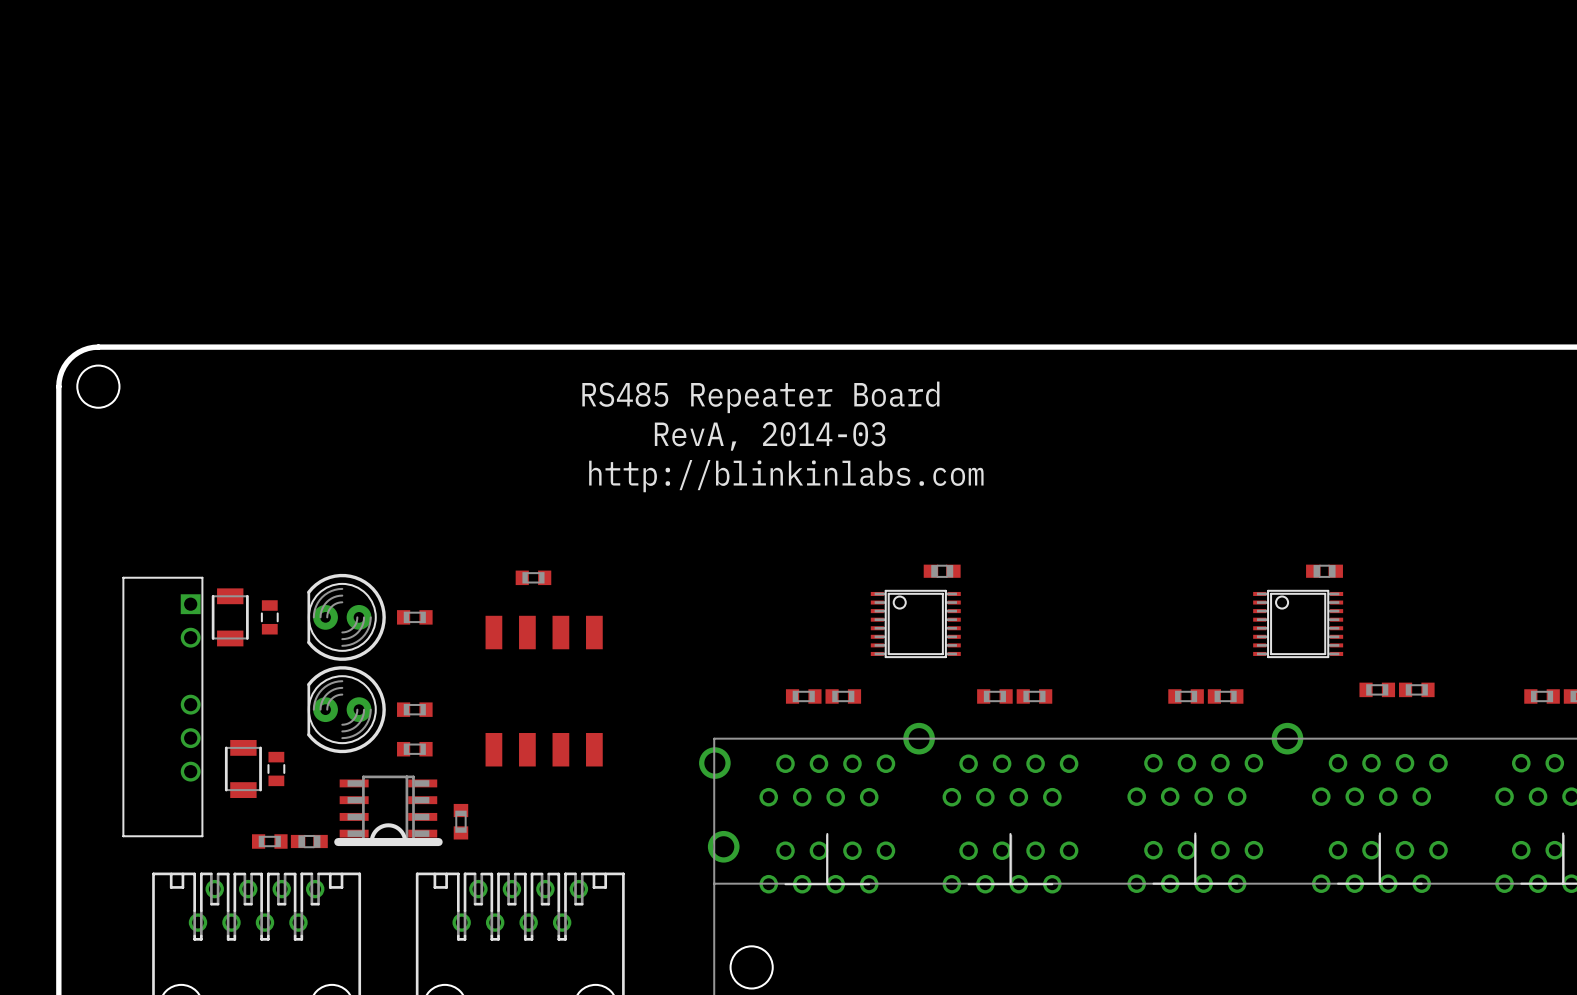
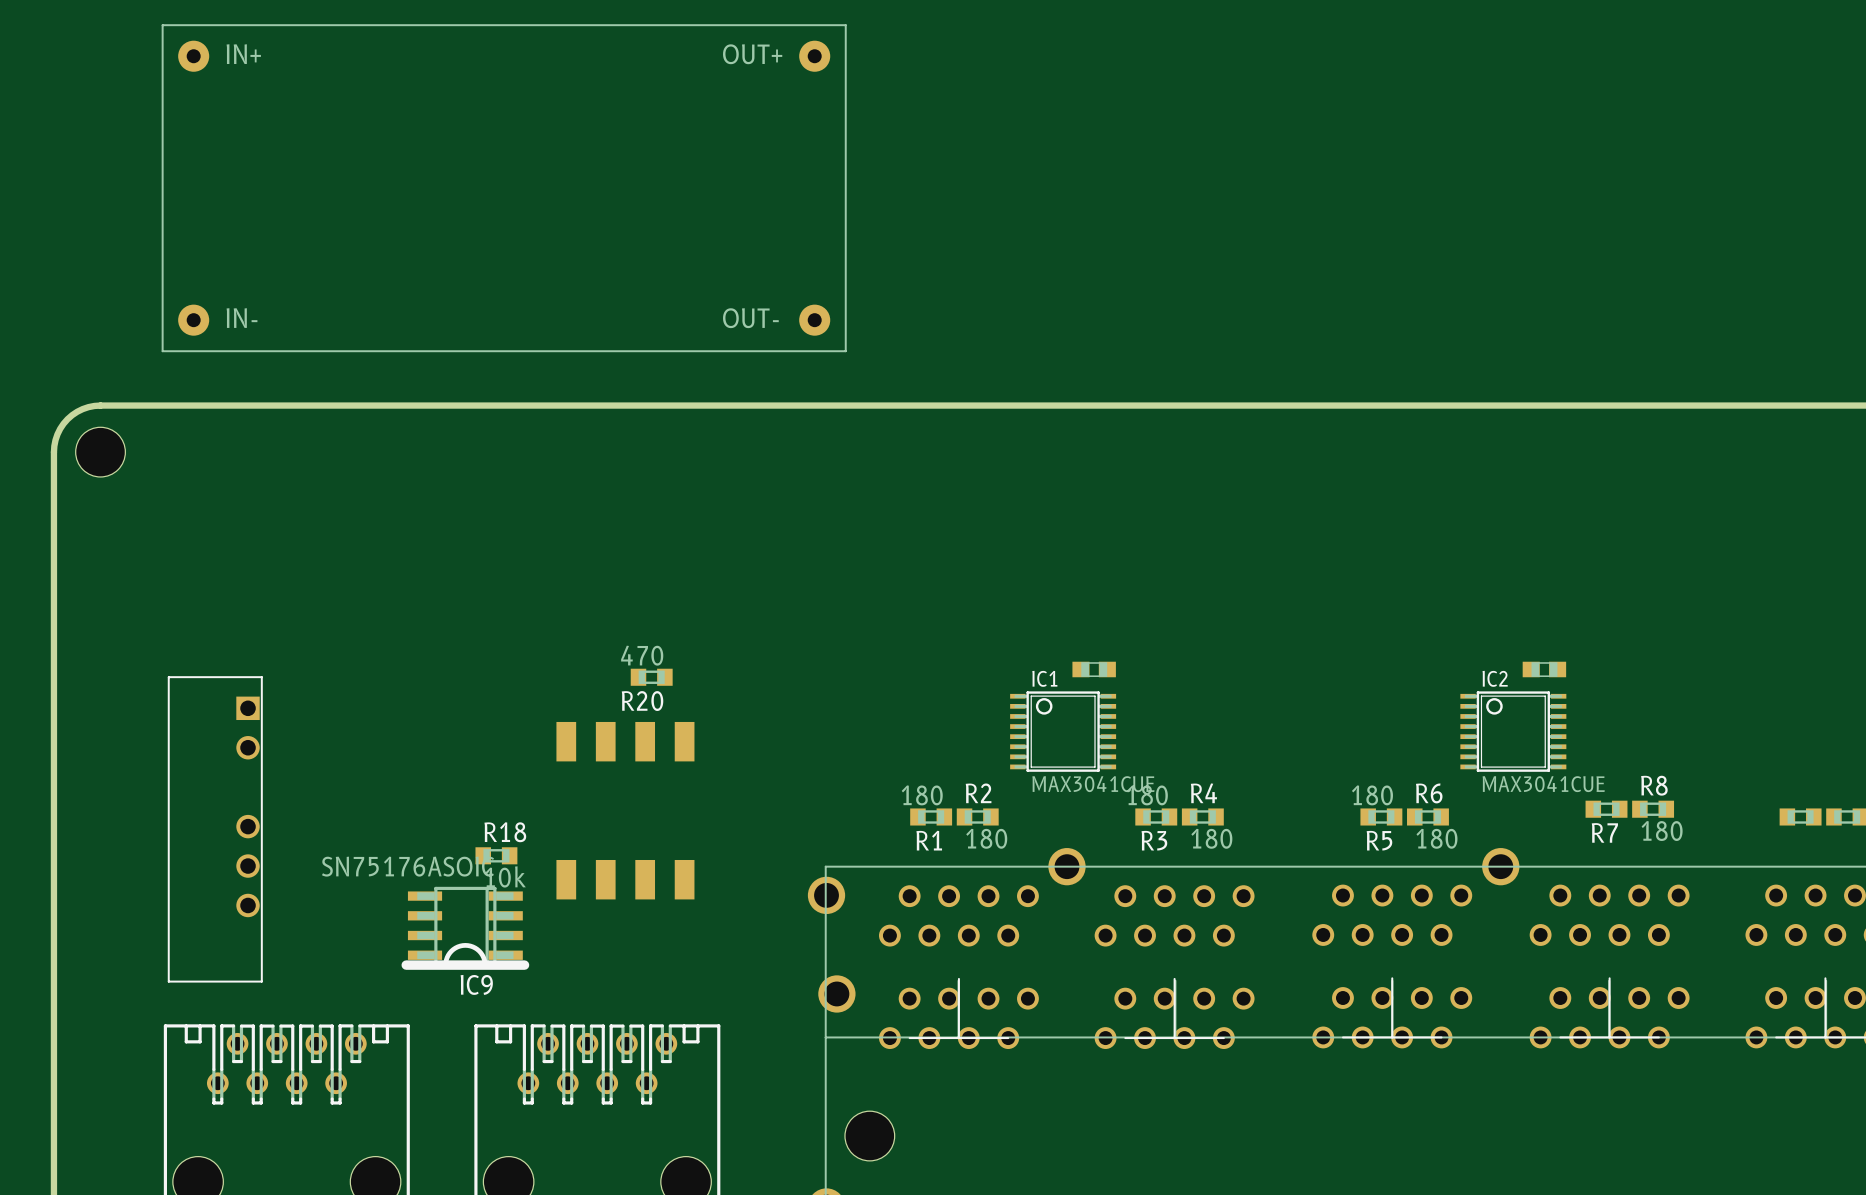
part: none -> (504, 188)
text: RS485 Repeater Board (760, 397) -> none
text: RevA, 2014-03 (770, 436) -> none
text: http://blinkinlabs.com (786, 476) -> none
part: (533, 577) -> none
R20: none -> 470 (651, 677)
IC1 name: none -> IC1 (1044, 678)
IC2 name: none -> IC2 (1495, 678)
part: (230, 617) -> none
part: (269, 617) -> none
part: (346, 617) -> none
part: (414, 617) -> none
IC1 value: none -> MAX3041CUE (1093, 784)
IC2 value: none -> MAX3041CUE (1543, 784)
R8 name: none -> R8 (1654, 785)
R2 name: none -> R2 (978, 793)
R4 name: none -> R4 (1203, 793)
R6 name: none -> R6 (1429, 793)
R1 value: none -> 180 (922, 795)
R3 value: none -> 180 (1147, 795)
R5 value: none -> 180 (1372, 795)
part position: (162, 706) -> (215, 829)
R8 value: none -> 180 (1662, 831)
part: (346, 709) -> none
part: (414, 709) -> none
R7 name: none -> R7 (1604, 832)
R2 value: none -> 180 (986, 838)
R4 value: none -> 180 (1211, 838)
R6 value: none -> 180 (1436, 838)
R1 name: none -> R1 (929, 840)
R3 name: none -> R3 (1154, 840)
R5 name: none -> R5 (1379, 840)
R18: none -> 10k (496, 855)
part: (414, 749) -> none
part: (243, 768) -> none
part: (276, 768) -> none
IC9: none -> SN75176ASOIC (465, 928)
part: (388, 810) -> none
part: (460, 821) -> none
part: (269, 841) -> none
part: (309, 841) -> none

